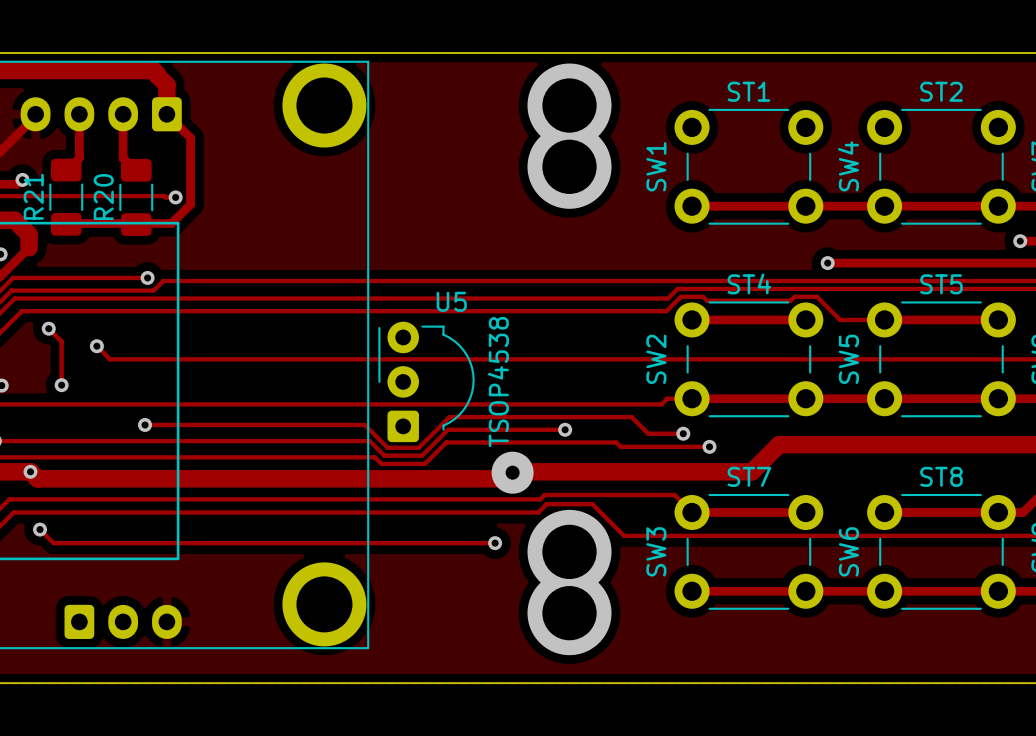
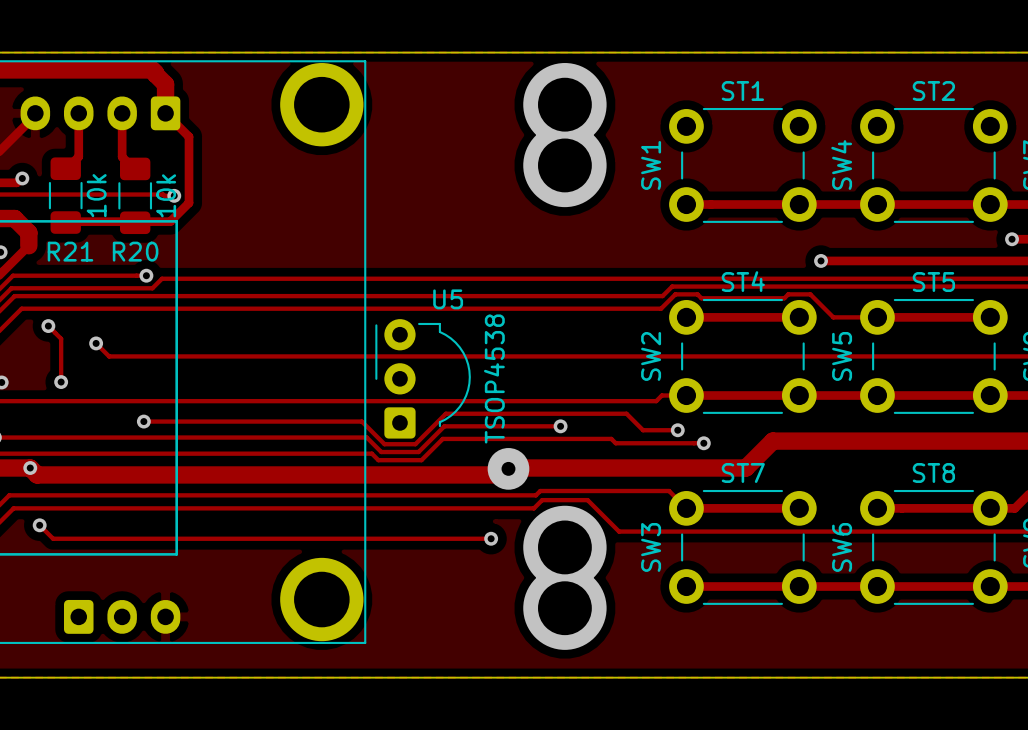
R21 name rotation: 0° (33, 196) -> 90° clockwise (70, 251)
R21 name position: R21 (33, 196) -> R21 (70, 251)
R21 value: none -> 10k (96, 195)
R20 name rotation: 0° (103, 197) -> 90° clockwise (135, 251)
R20 name position: R20 (103, 197) -> R20 (135, 251)
R20 value: none -> 10k (166, 195)

